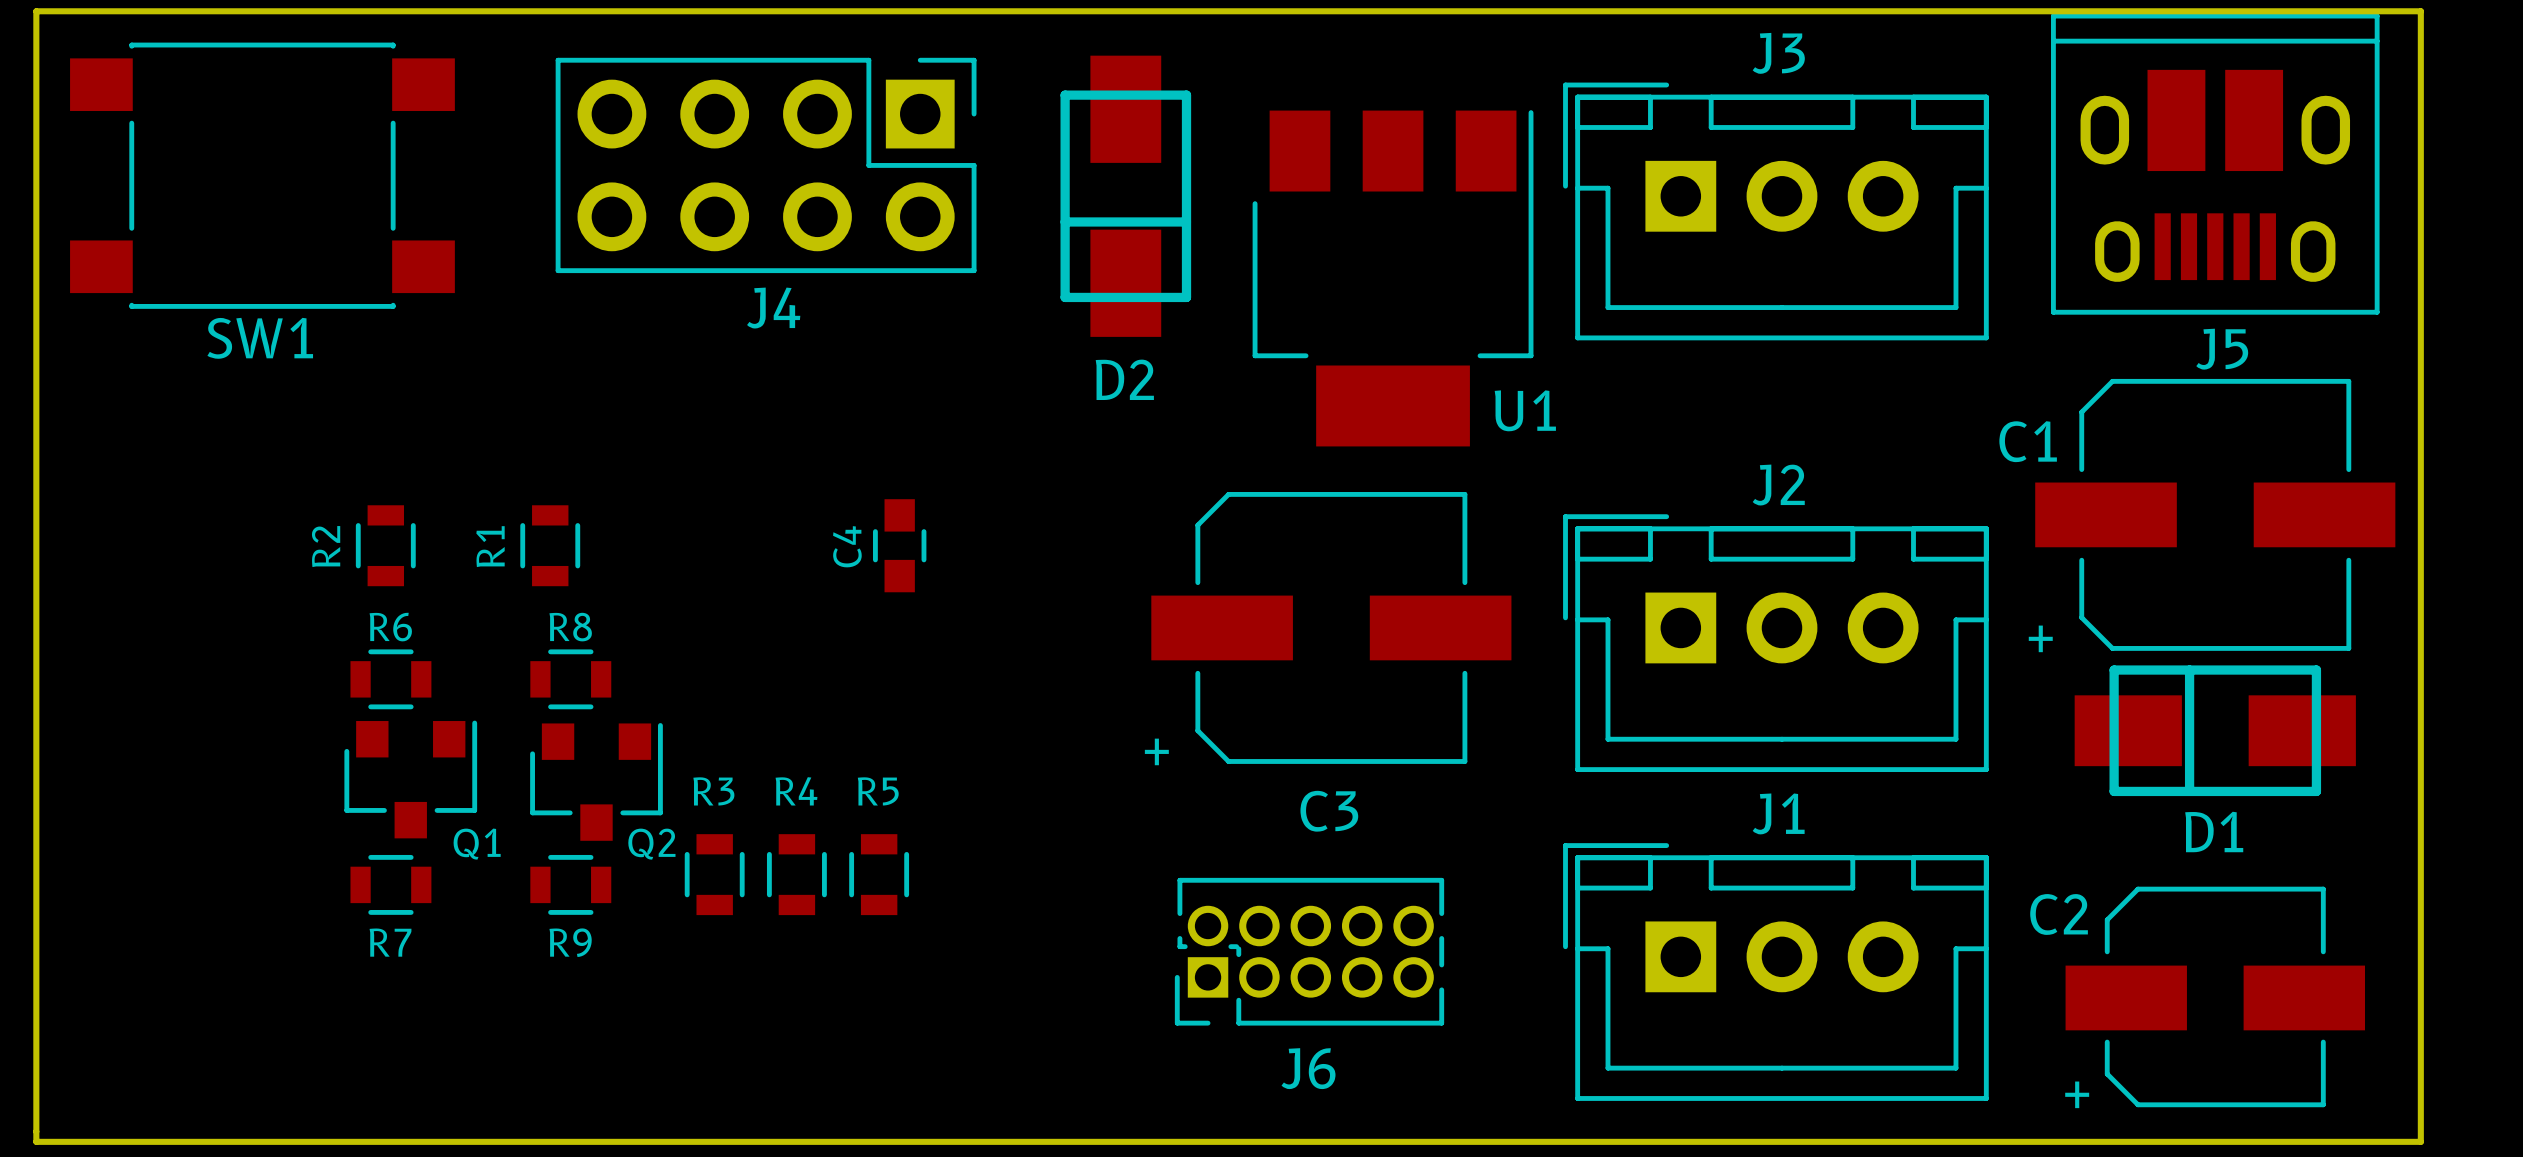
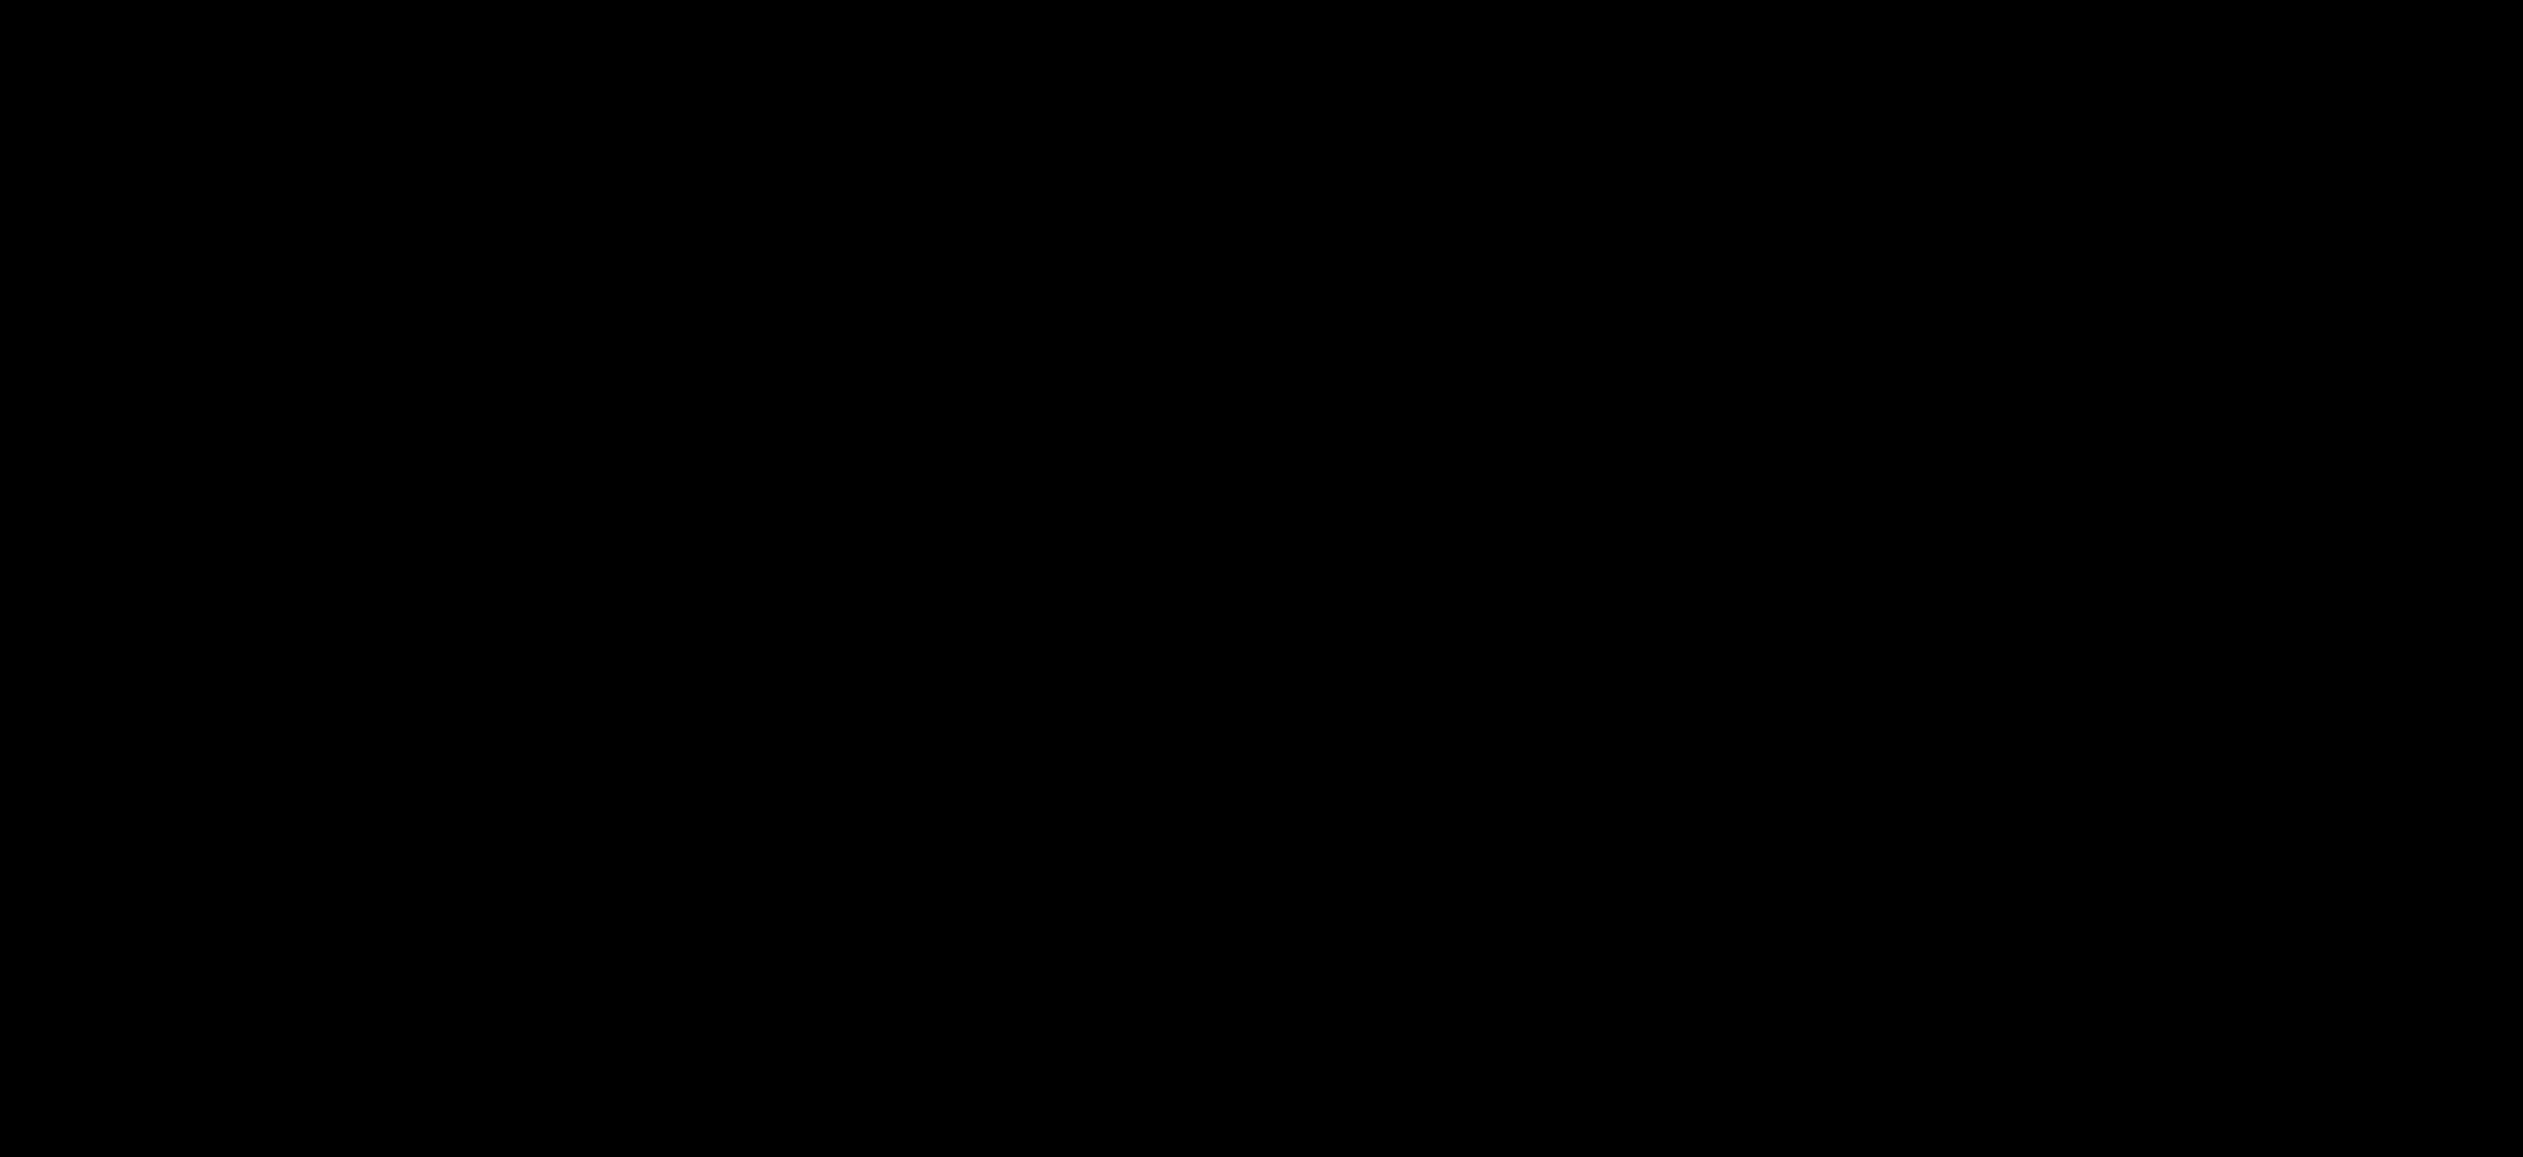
board edge: (36, 11) (36, 1141) (2420, 1141) (2420, 11) (36, 11) -> none
J5: (2215, 164) -> none
J4: (766, 165) -> none
SW1: (262, 175) -> none
D2: (1125, 196) -> none
J3: (1775, 211) -> none
U1: (1393, 278) -> none
C1: (2215, 514) -> none
R2: (385, 545) -> none
R1: (550, 545) -> none
C4: (899, 545) -> none
C3: (1331, 627) -> none
J2: (1775, 643) -> none
R6: (390, 679) -> none
R8: (570, 679) -> none
D1: (2215, 730) -> none
Q1: (410, 779) -> none
Q2: (596, 781) -> none
R3: (714, 874) -> none
R4: (796, 874) -> none
R5: (879, 874) -> none
R7: (390, 884) -> none
R9: (570, 884) -> none
J6: (1309, 951) -> none
J1: (1775, 972) -> none
C2: (2215, 996) -> none

